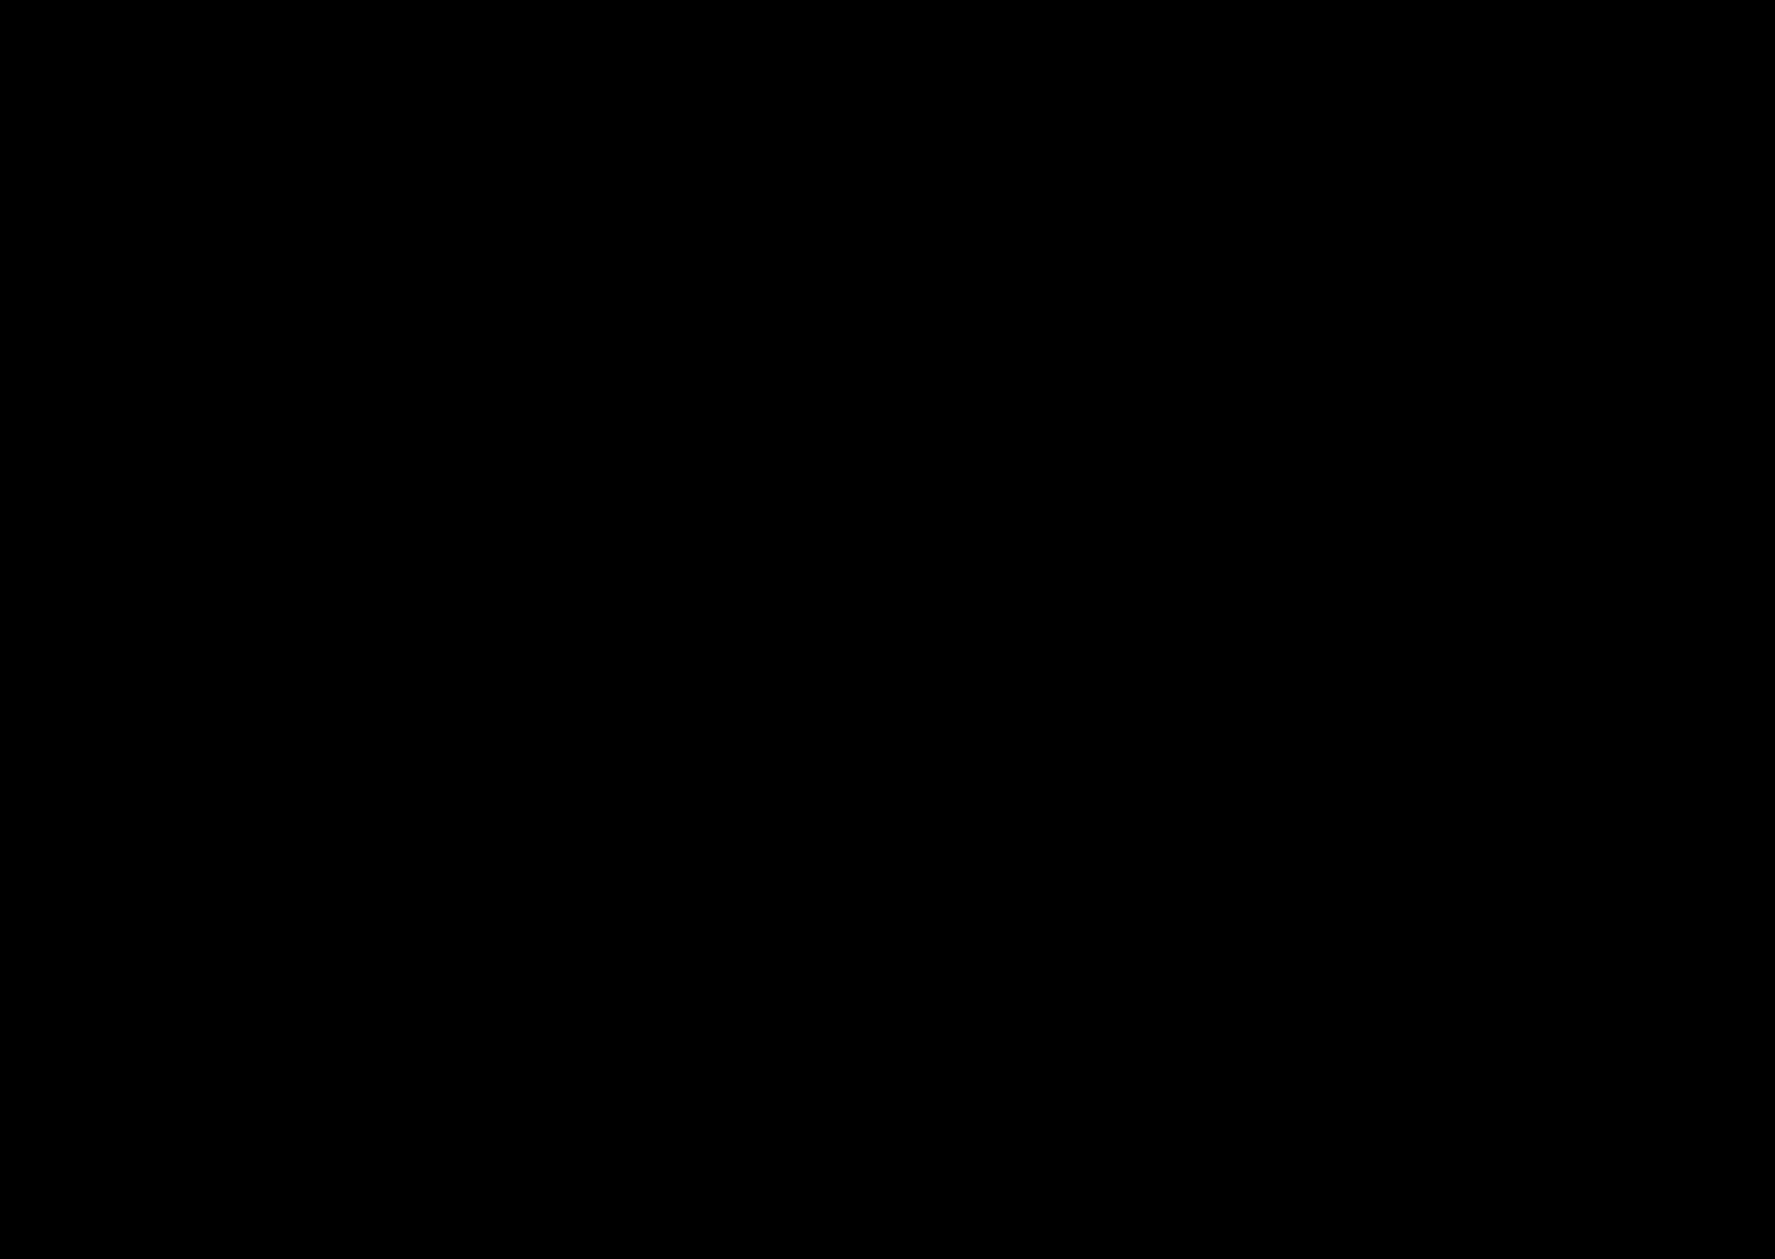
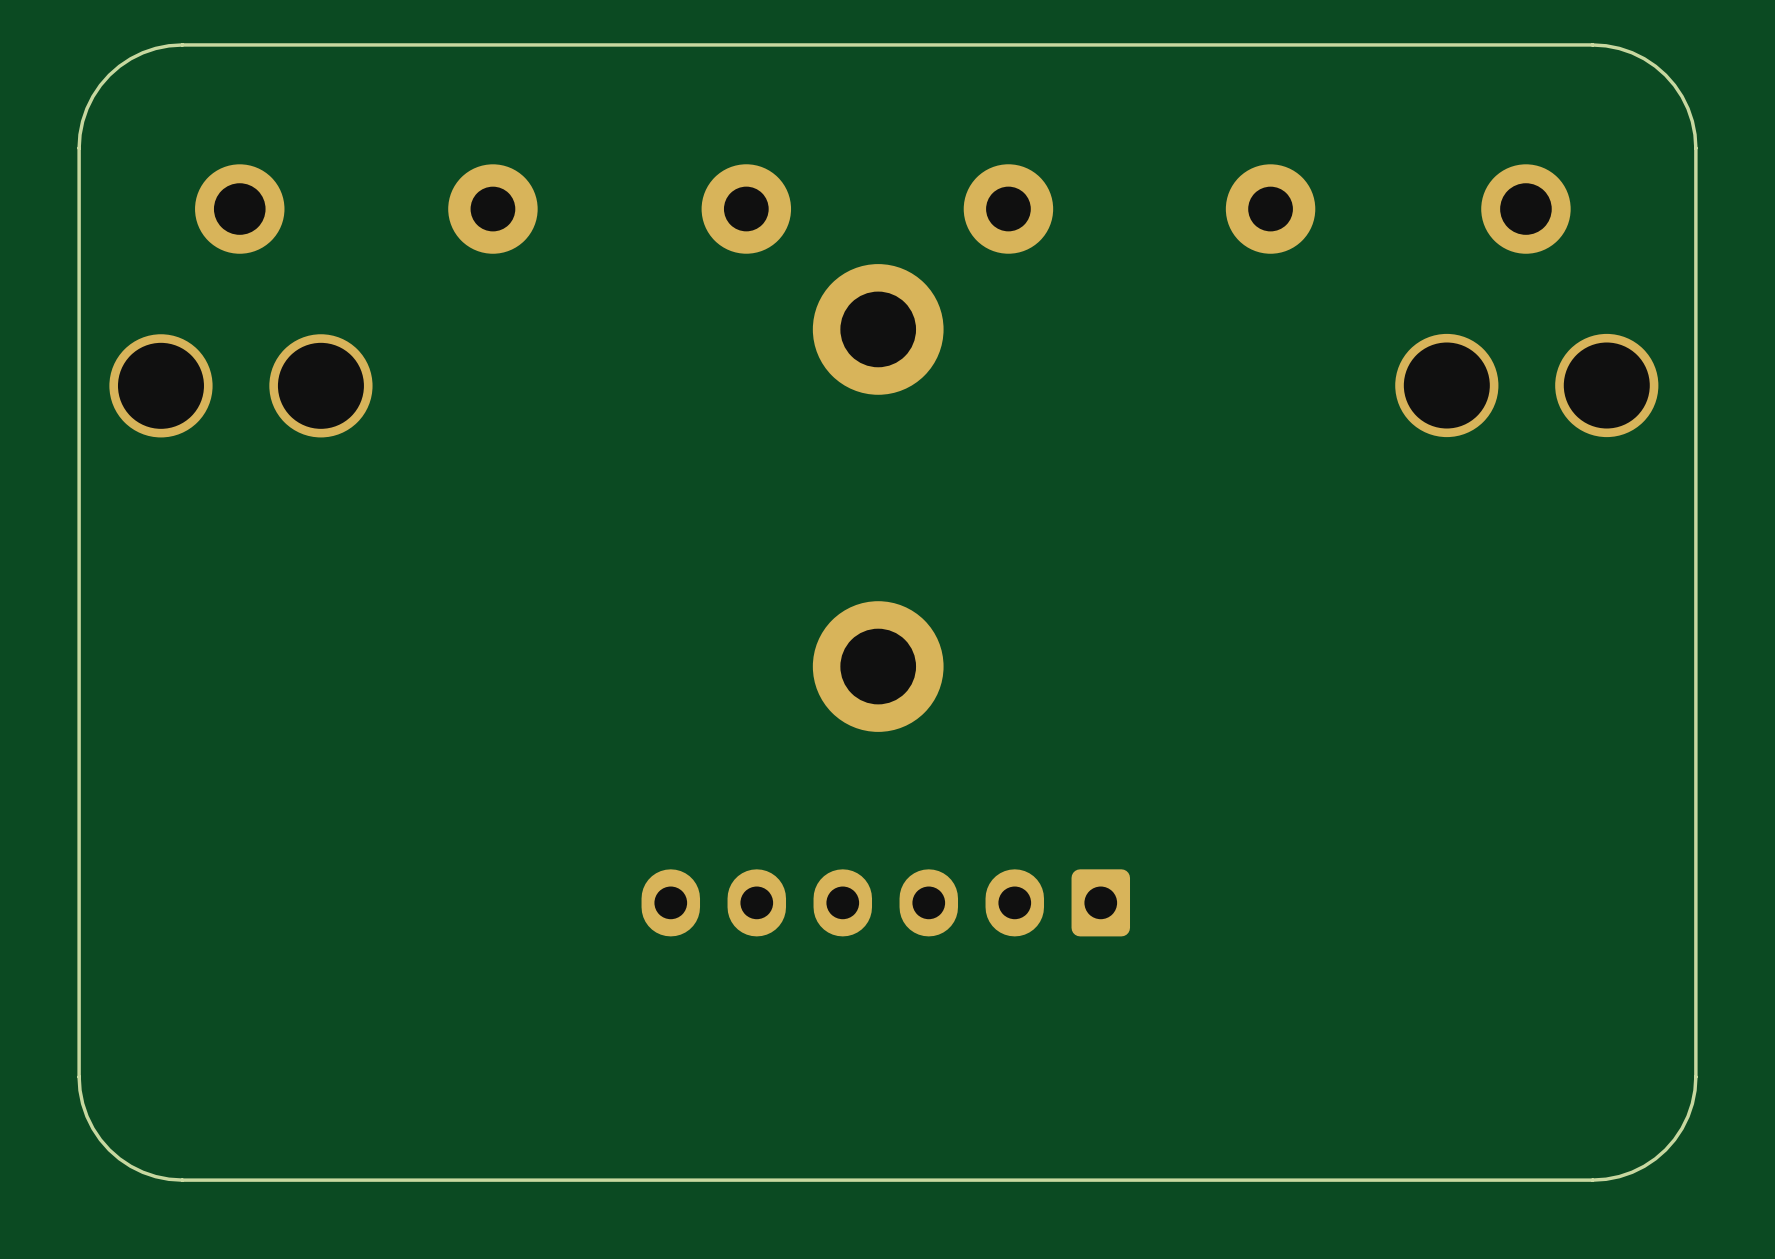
board edge: none -> (1592, 44) (182, 44) (155, 48) (130, 58) (119, 66) (100, 85) (86, 108) (79, 134) (79, 148) (79, 1076) (82, 1103) (86, 1116) (100, 1139) (119, 1158) (142, 1172) (168, 1179) (182, 1180) (1592, 1180) (1619, 1176) (1644, 1166) (1655, 1158) (1674, 1139) (1688, 1116) (1694, 1090) (1695, 1076) (1695, 148) (1694, 134) (1688, 108) (1674, 85) (1665, 75) (1644, 58) (1632, 52) (1606, 45) (1592, 44)
part: none -> (239, 209)
part: none -> (492, 209)
part: none -> (746, 209)
part: none -> (1008, 209)
part: none -> (1270, 209)
part: none -> (1525, 209)
part: none -> (878, 329)
part: none -> (160, 385)
part: none -> (320, 385)
part: none -> (1446, 385)
part: none -> (1606, 385)
part: none -> (878, 666)
part: none -> (885, 902)

